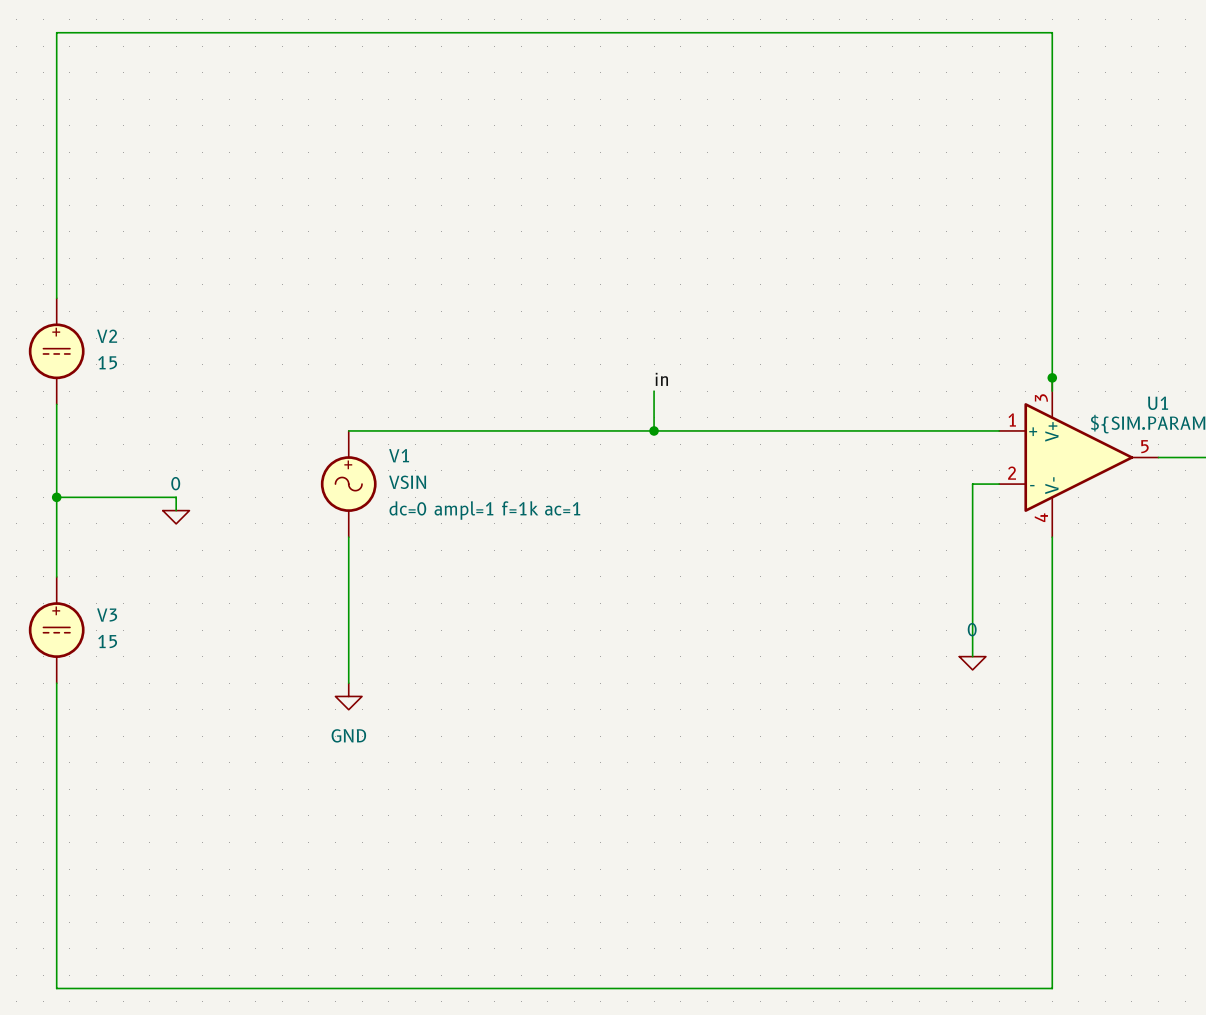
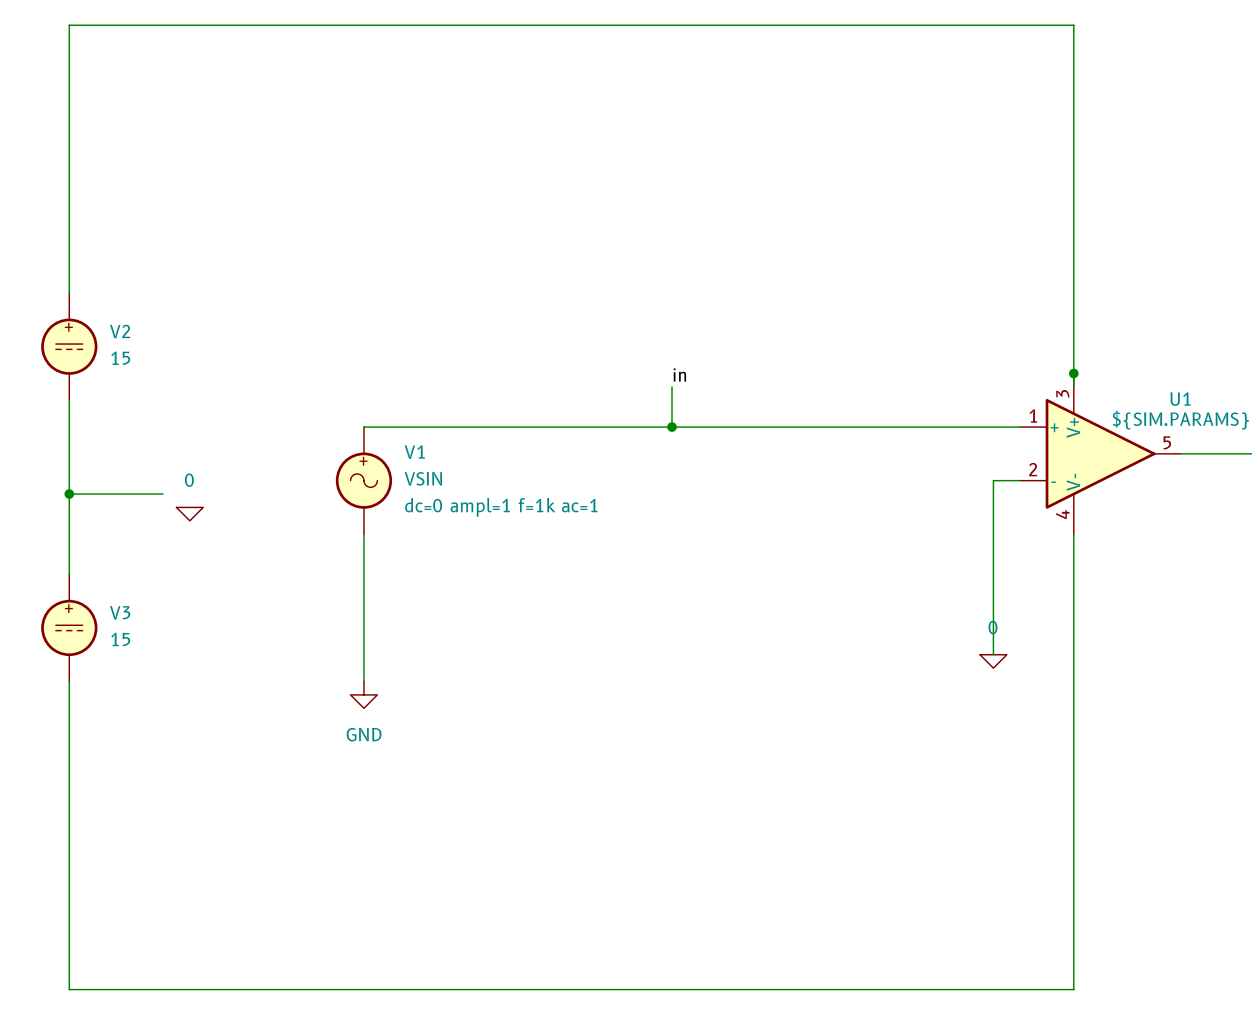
wire: (149, 497) (176, 497) (176, 510) -> none

